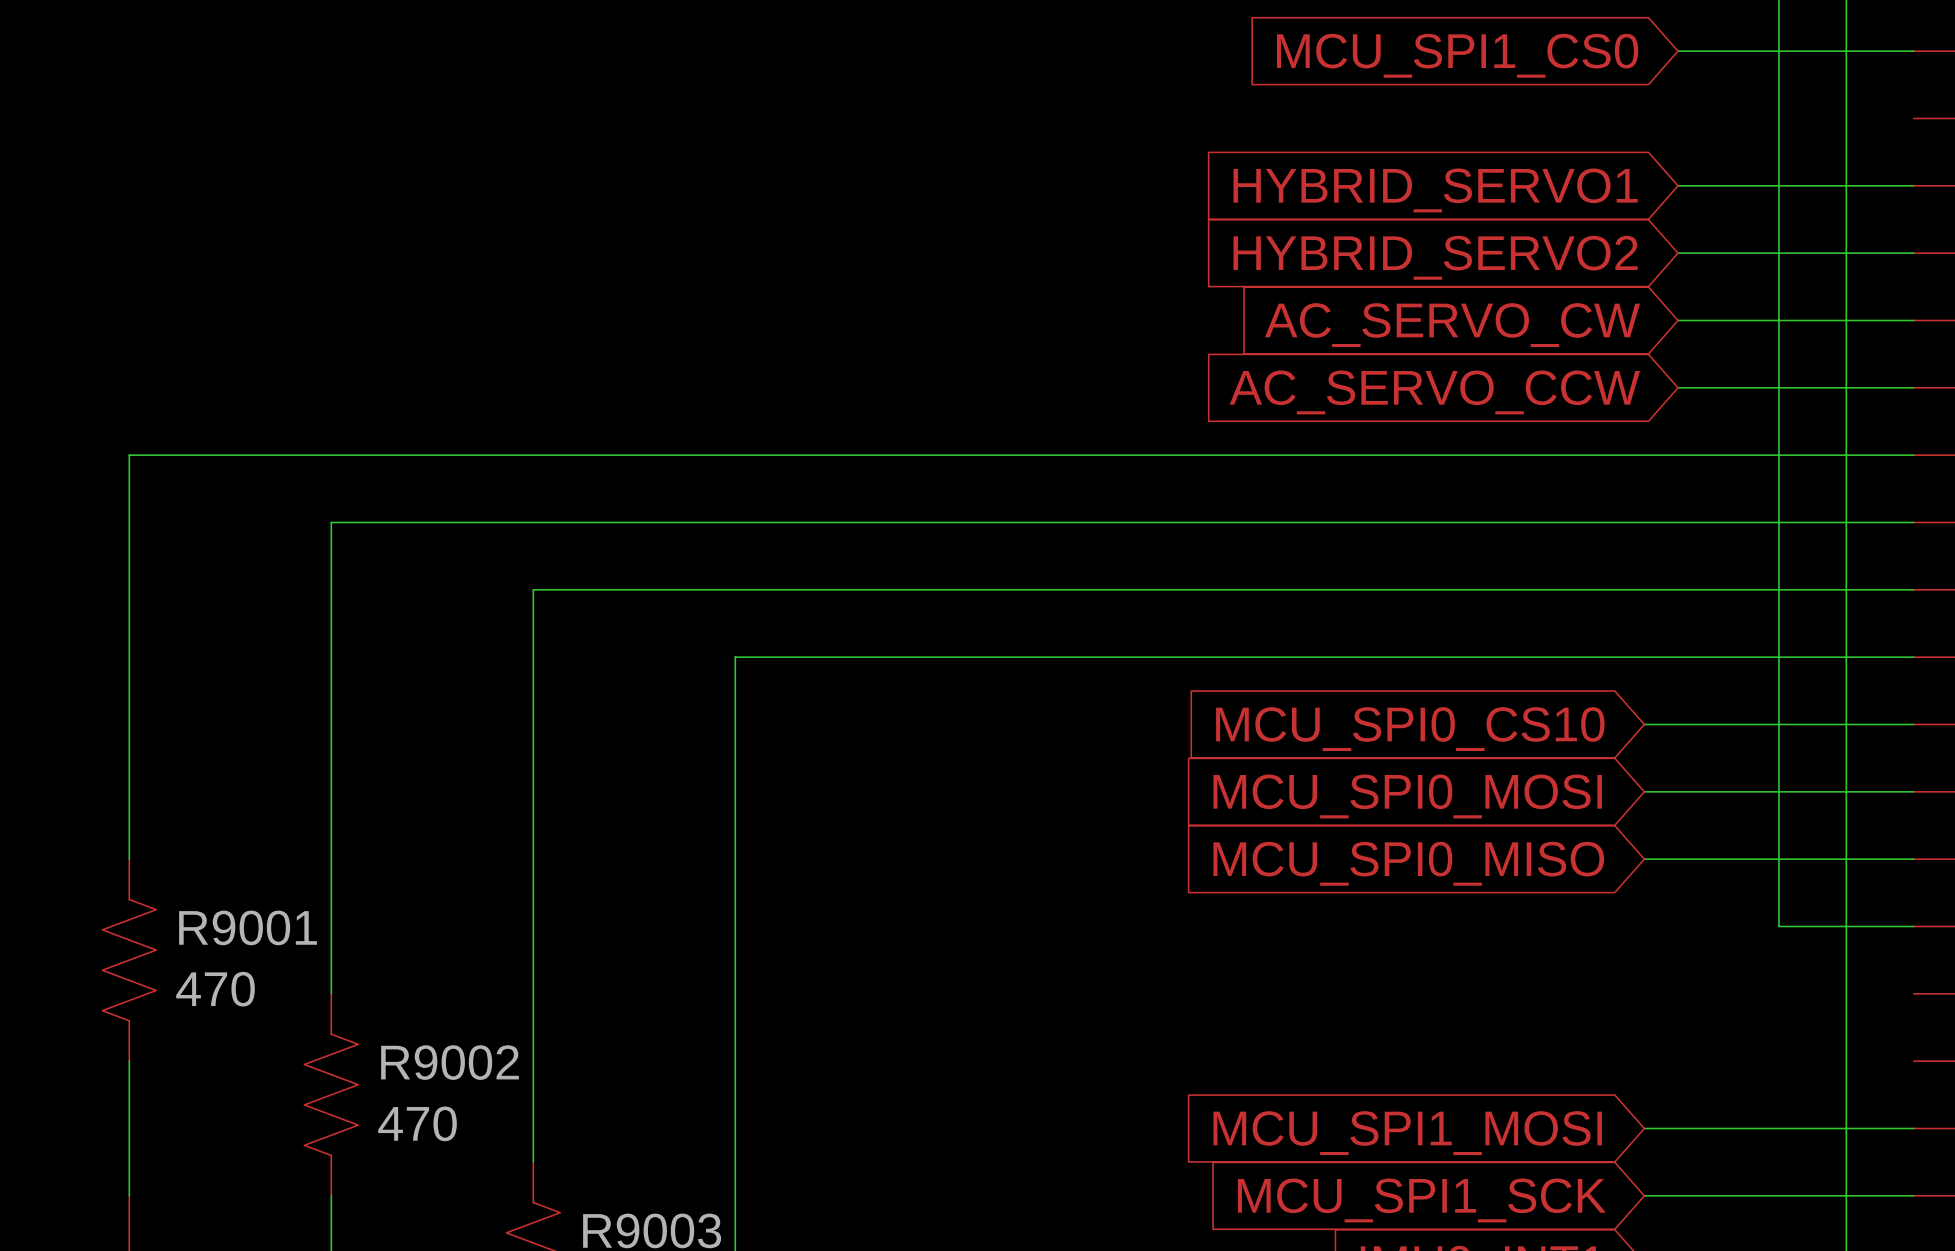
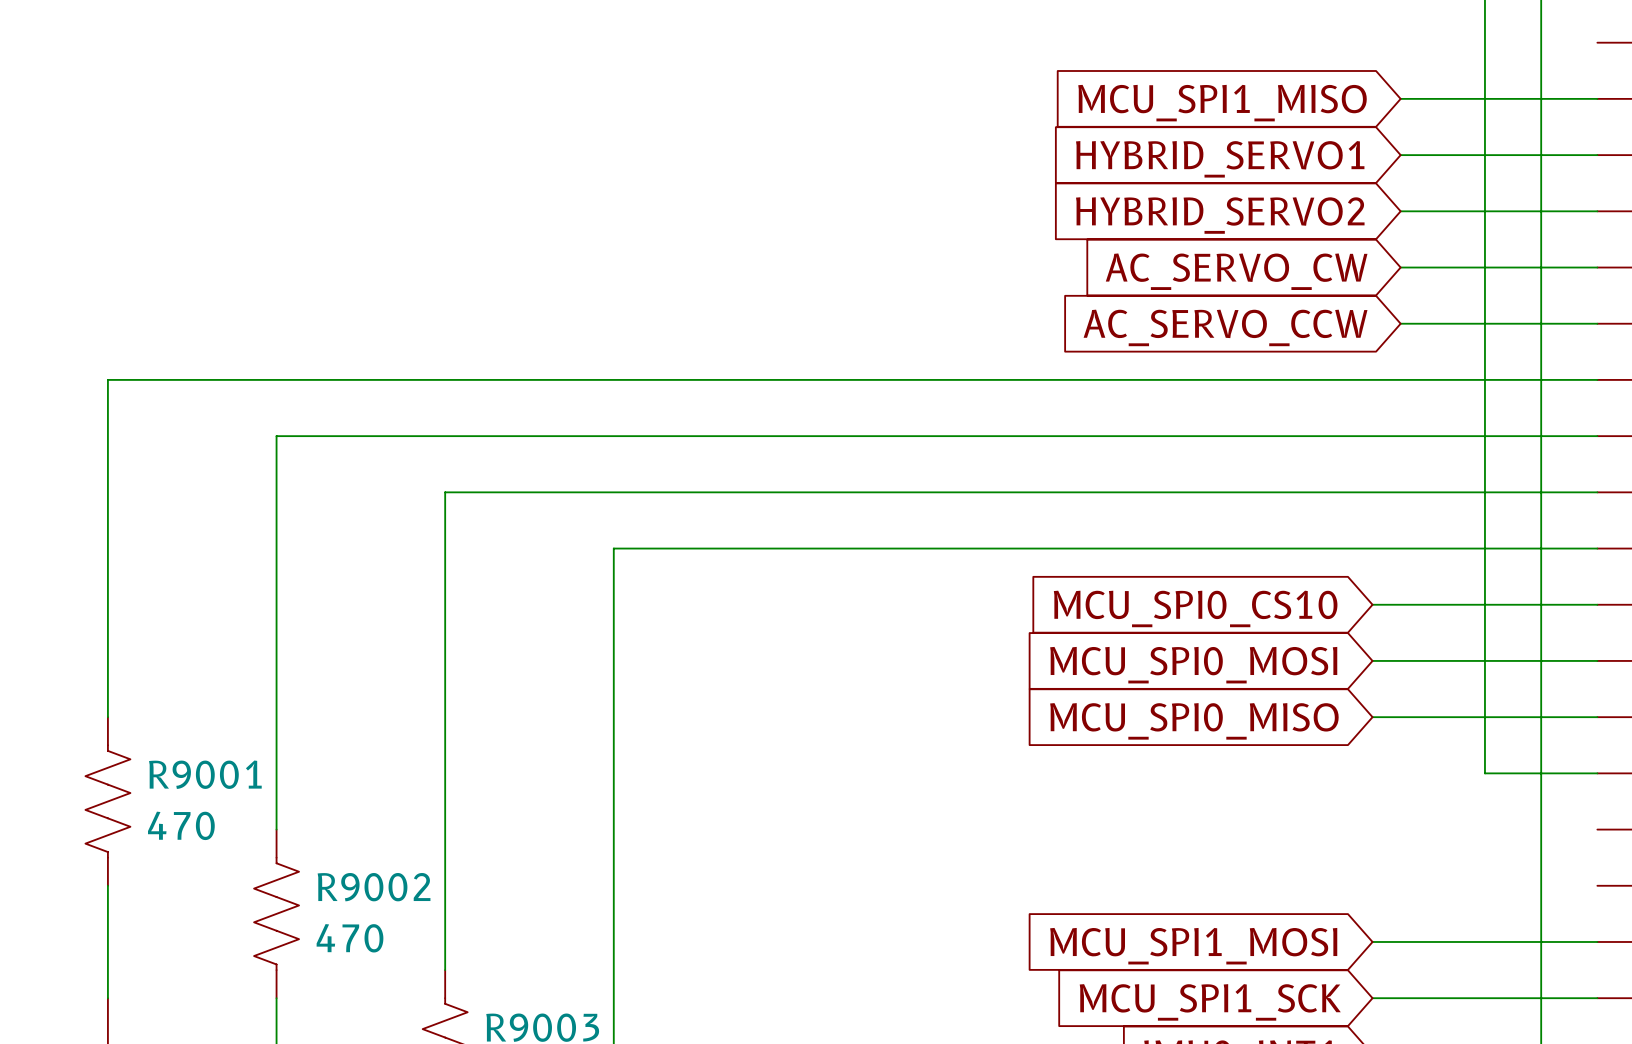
wire: (1678, 51) (1913, 51) -> (1400, 98) (1597, 98)
global label: MCU_SPI1_CS0 (1457, 55) -> MCU_SPI1_MISO (1222, 103)

